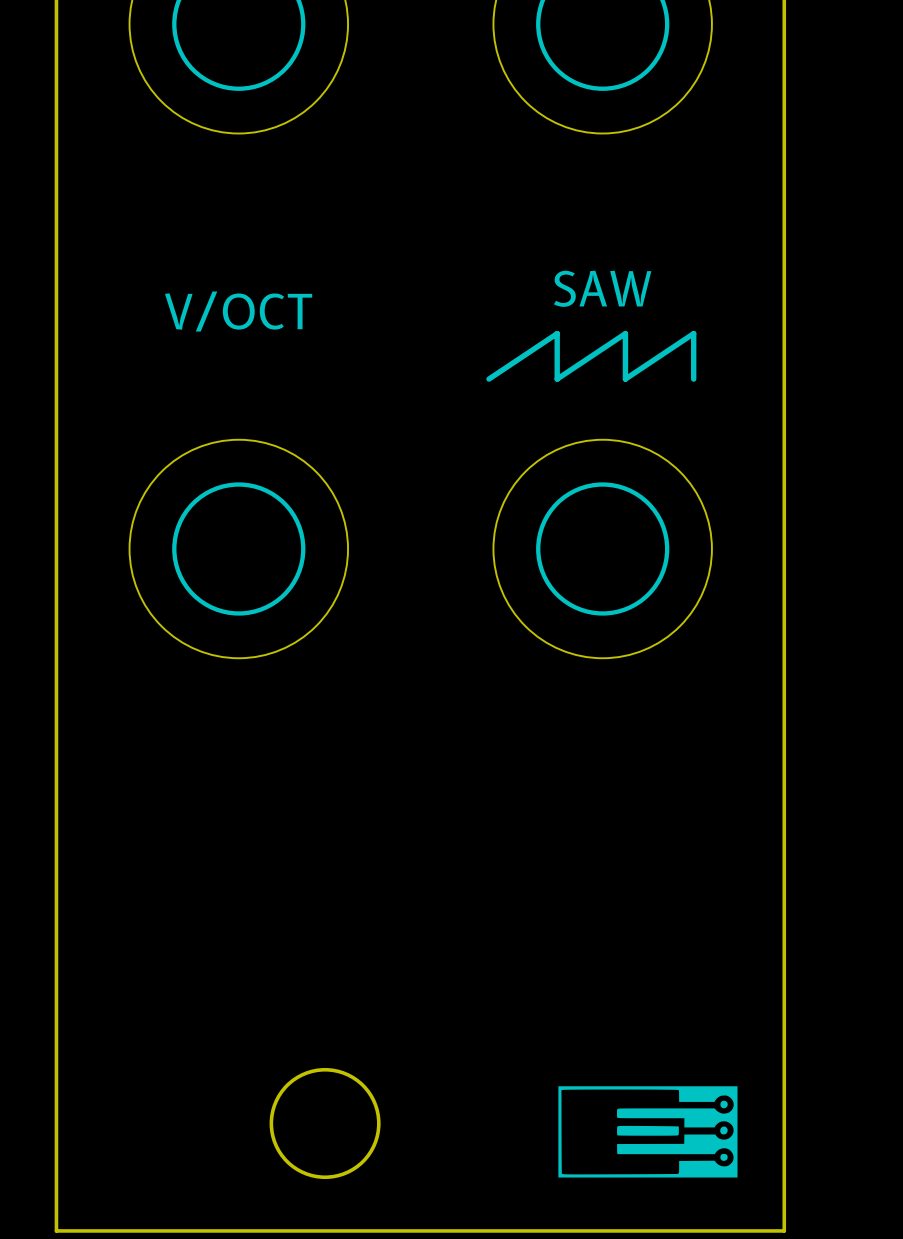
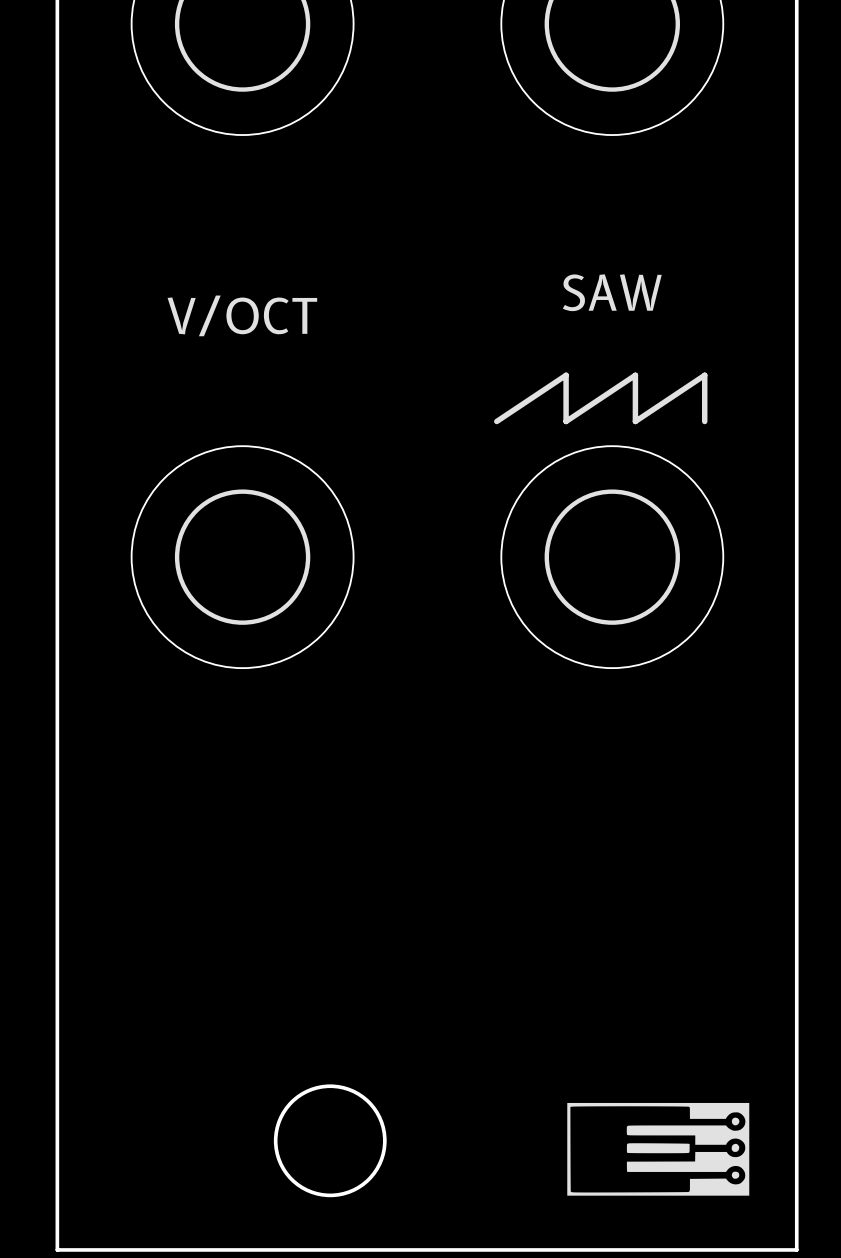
line: (557, 369) (557, 333) (488, 379) -> (566, 375) (496, 421)
line: (625, 369) (625, 333) (557, 379) -> (635, 375) (566, 421) (566, 384)
line: (693, 369) (693, 333) (625, 379) -> (704, 375) (635, 421) (635, 384)
line: none -> (704, 384) (704, 421)

